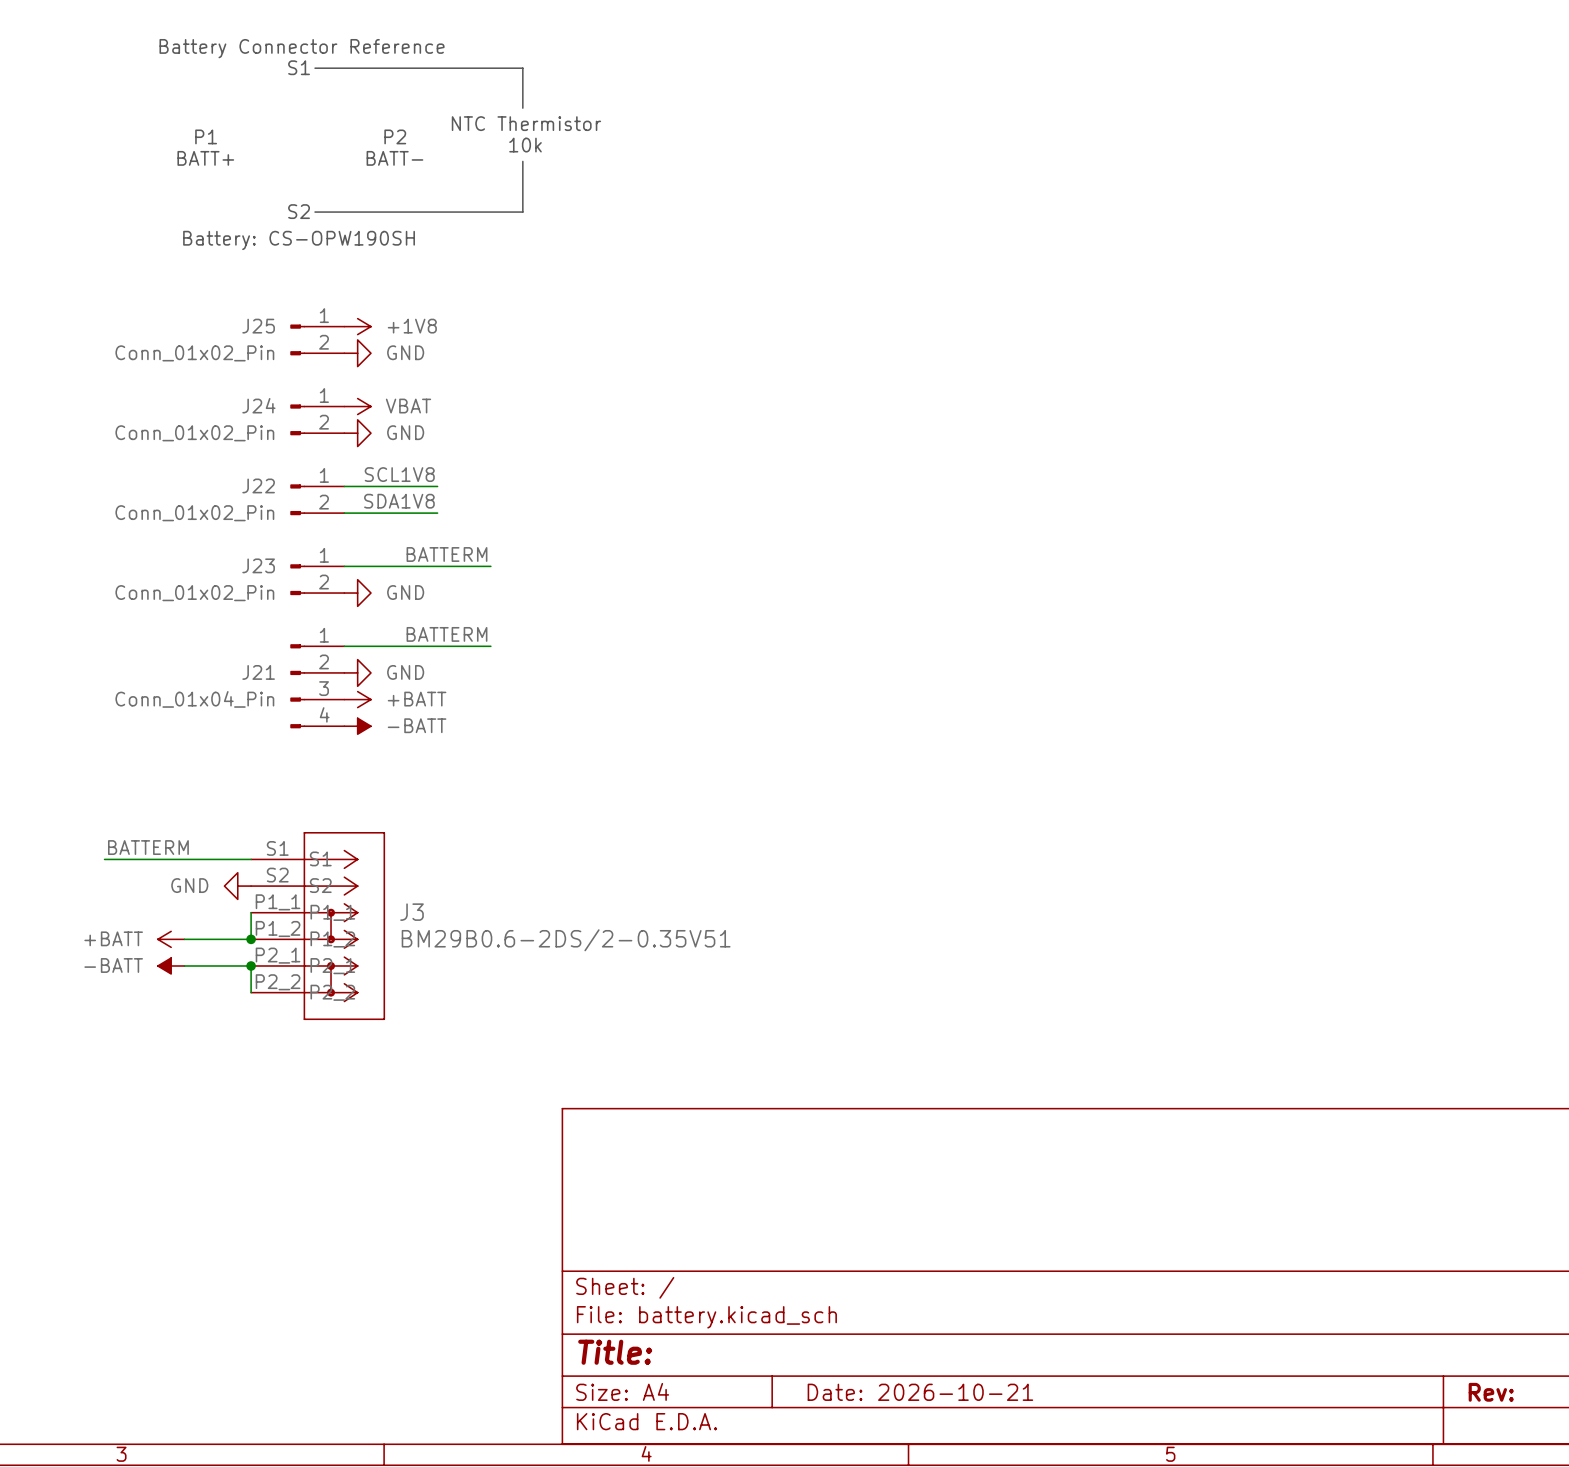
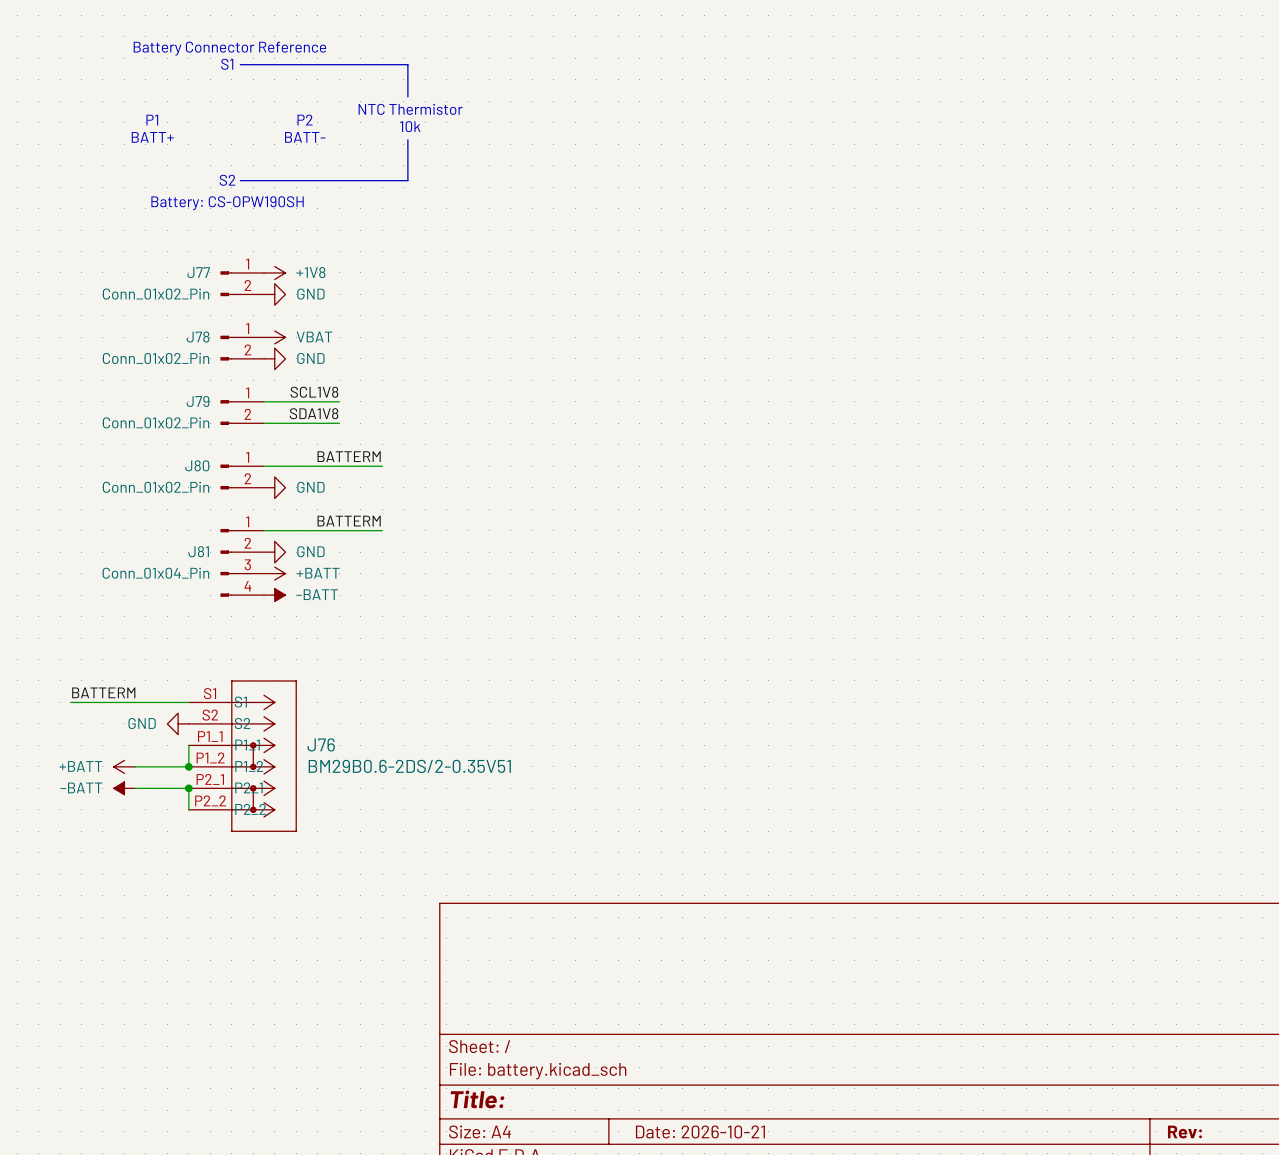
J25 name: J25 (258, 326) -> J77 (198, 272)
J24 name: J24 (258, 405) -> J78 (198, 336)
J22 name: J22 (258, 485) -> J79 (198, 401)
J23 name: J23 (258, 565) -> J80 (197, 465)
J21 name: J21 (258, 672) -> J81 (198, 551)
J3 name: J3 (411, 912) -> J76 (321, 744)

